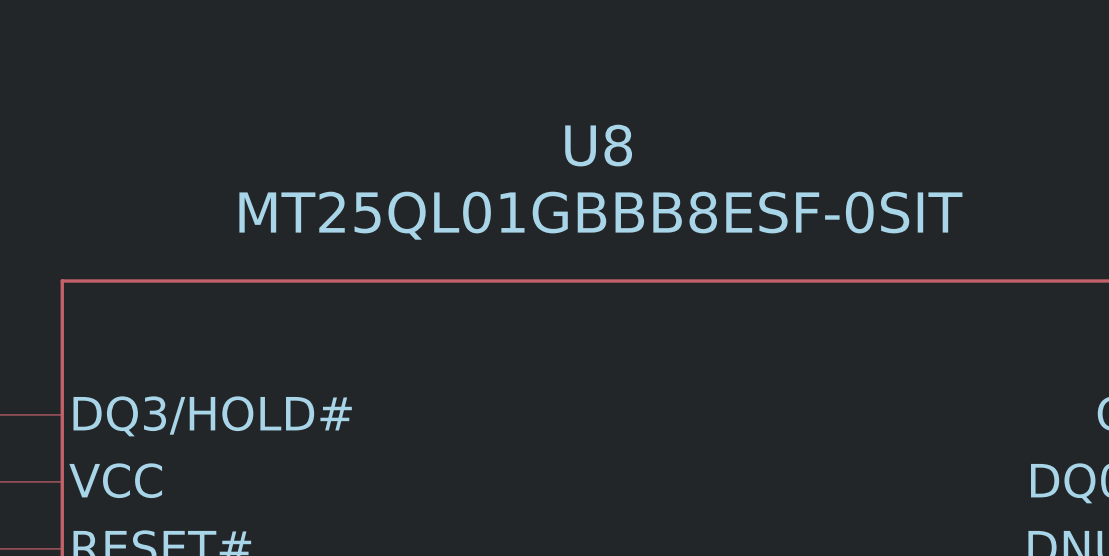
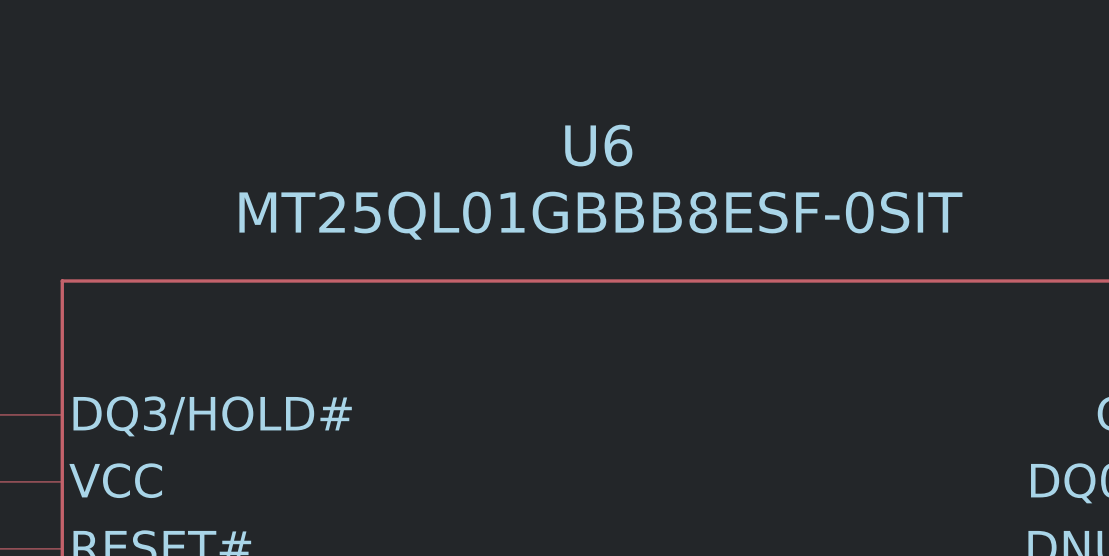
U8 name: U8 (598, 145) -> U6 (598, 145)

